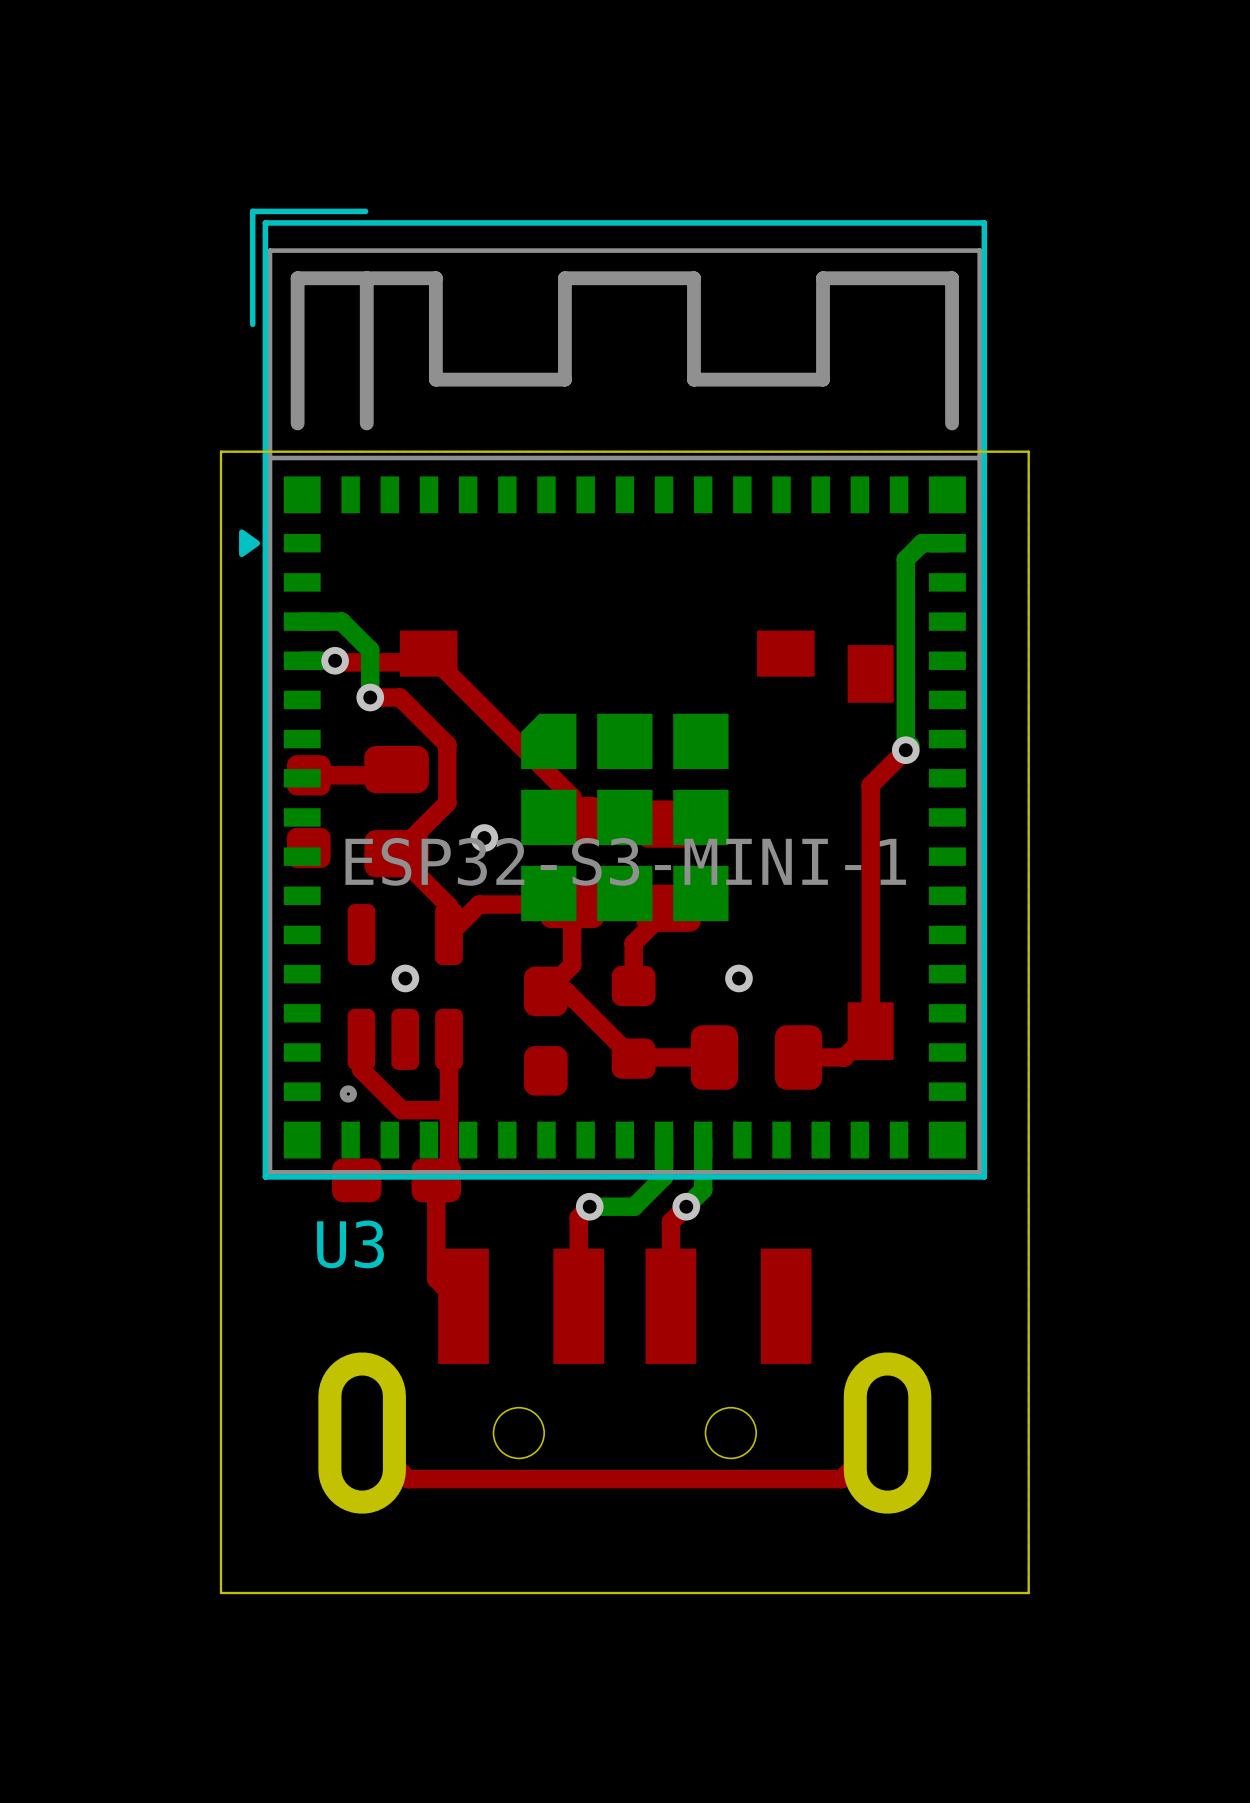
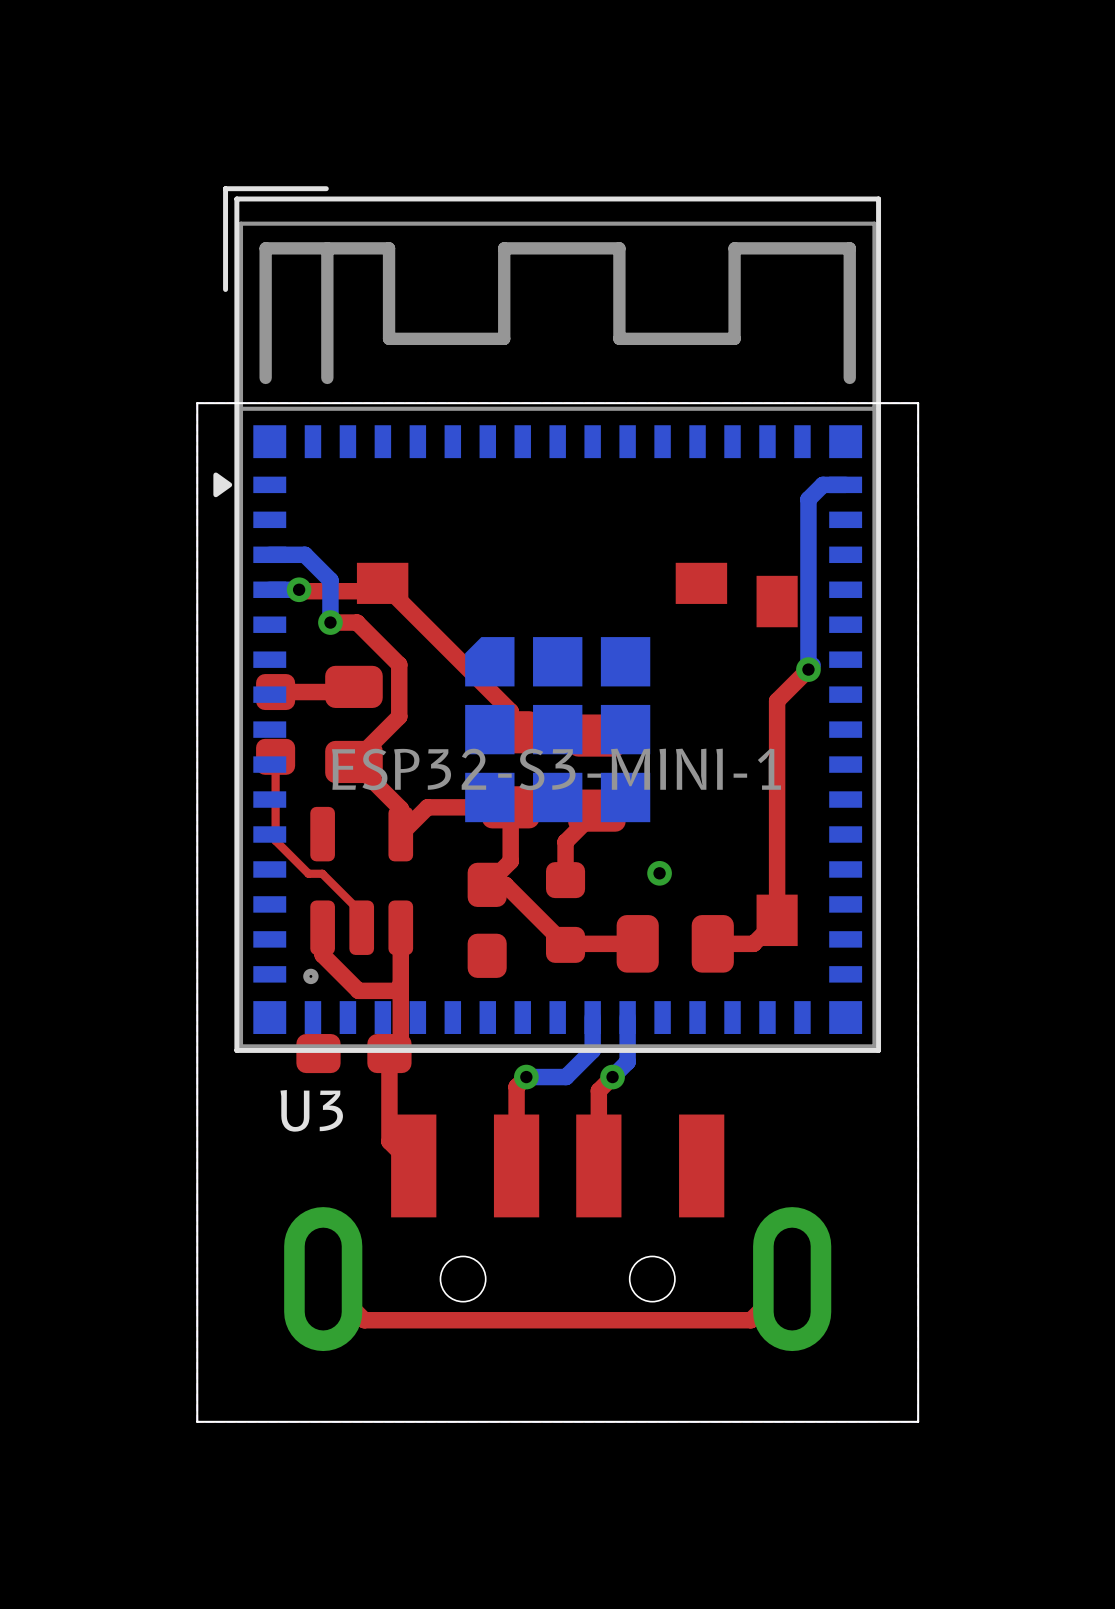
via: (484, 837) -> none
top track: none -> (275, 756) (275, 840) (308, 873) (322, 873) (361, 913)
via: (405, 978) -> none

